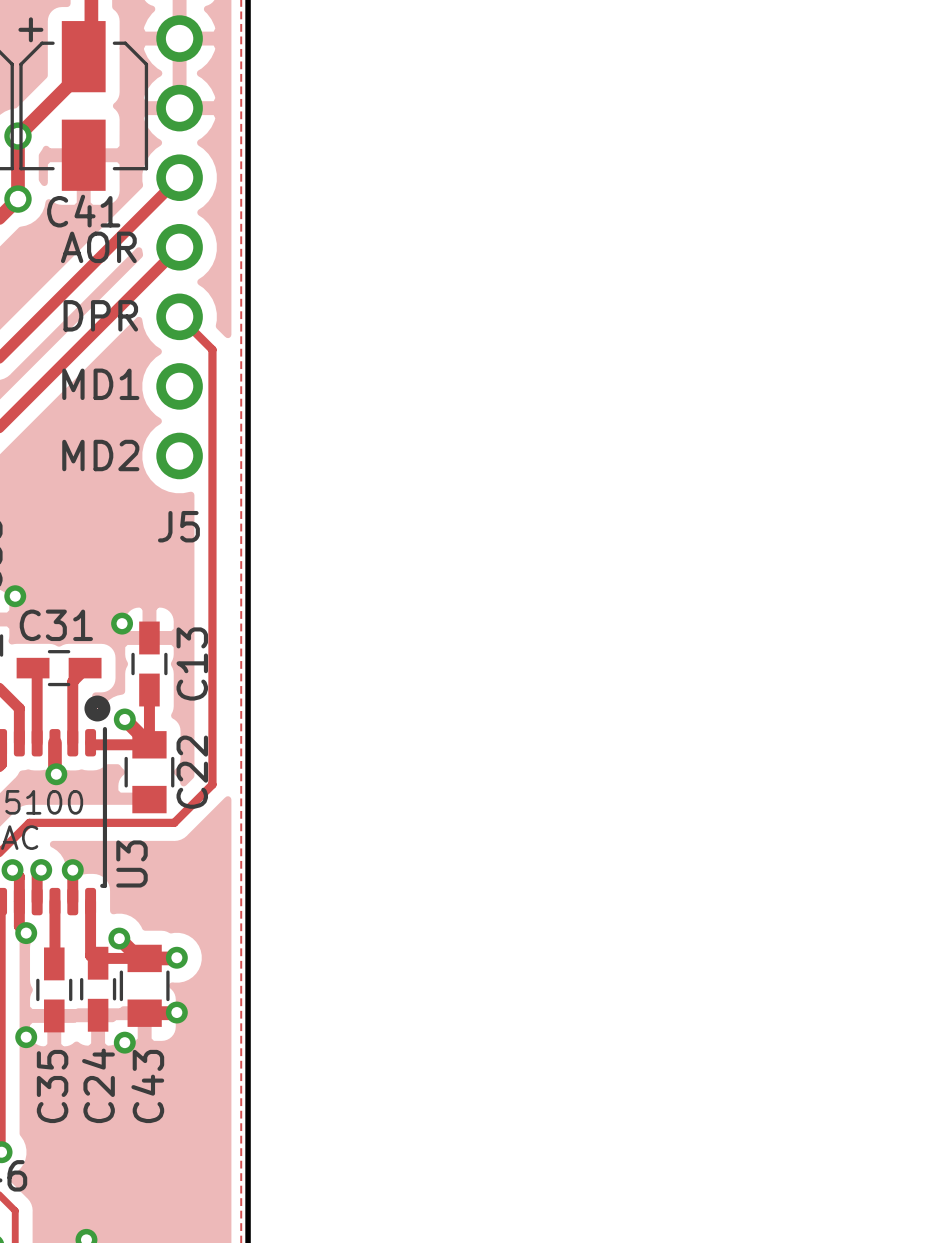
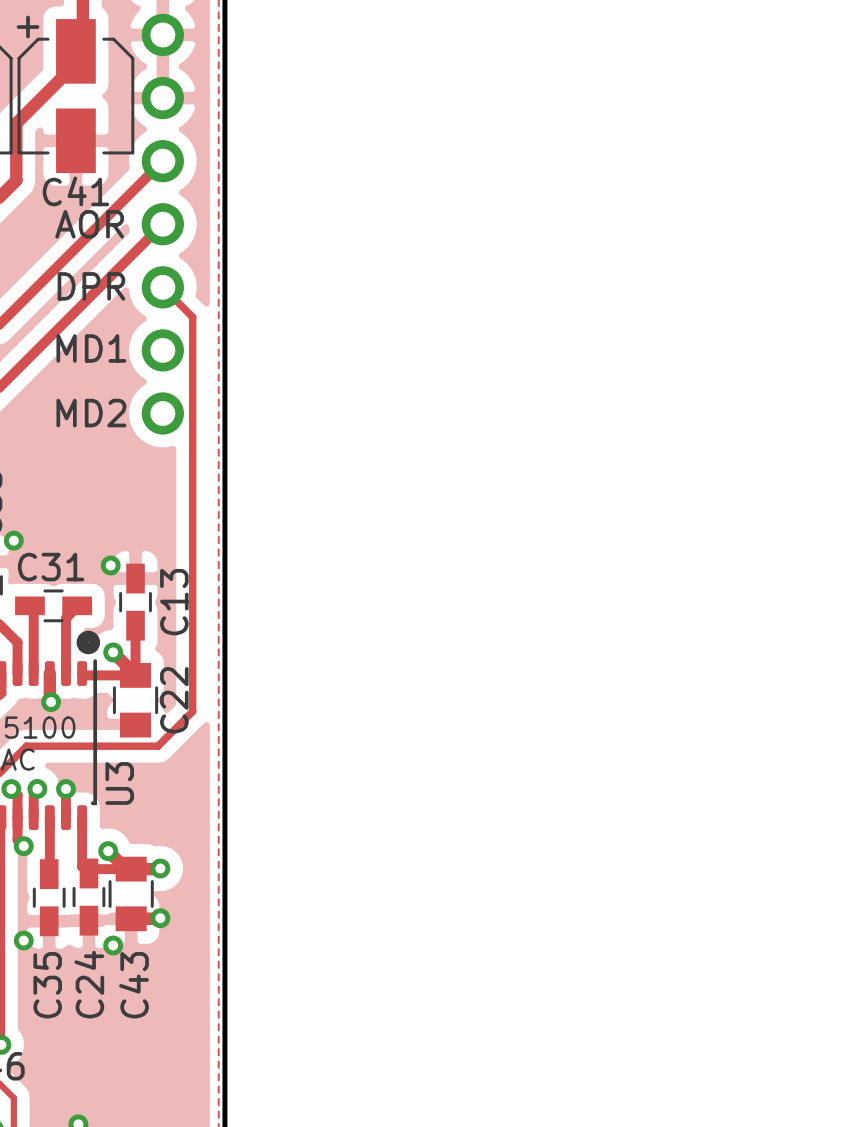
via: (17, 136) -> none
via: (17, 199) -> none
text: J5 (178, 526) -> none

